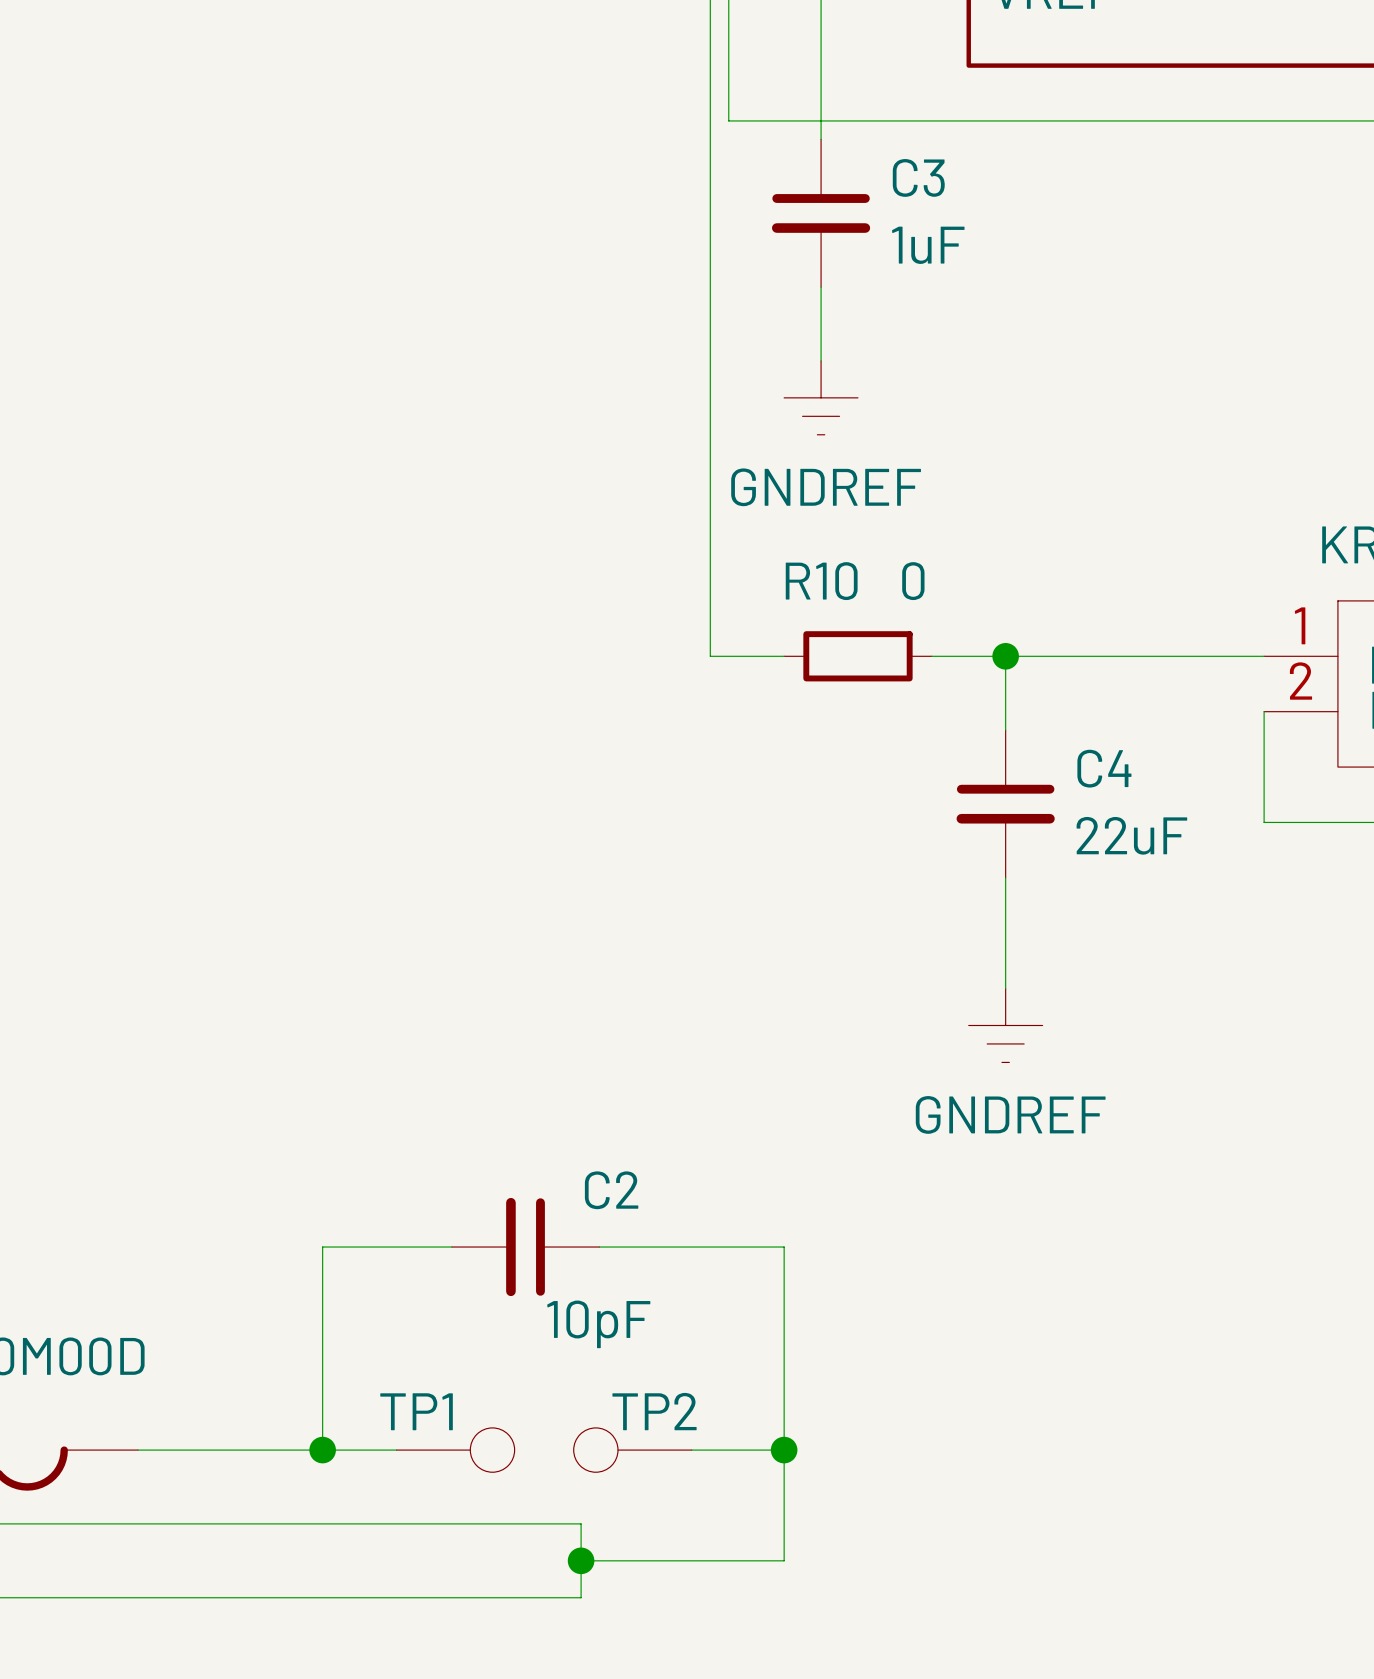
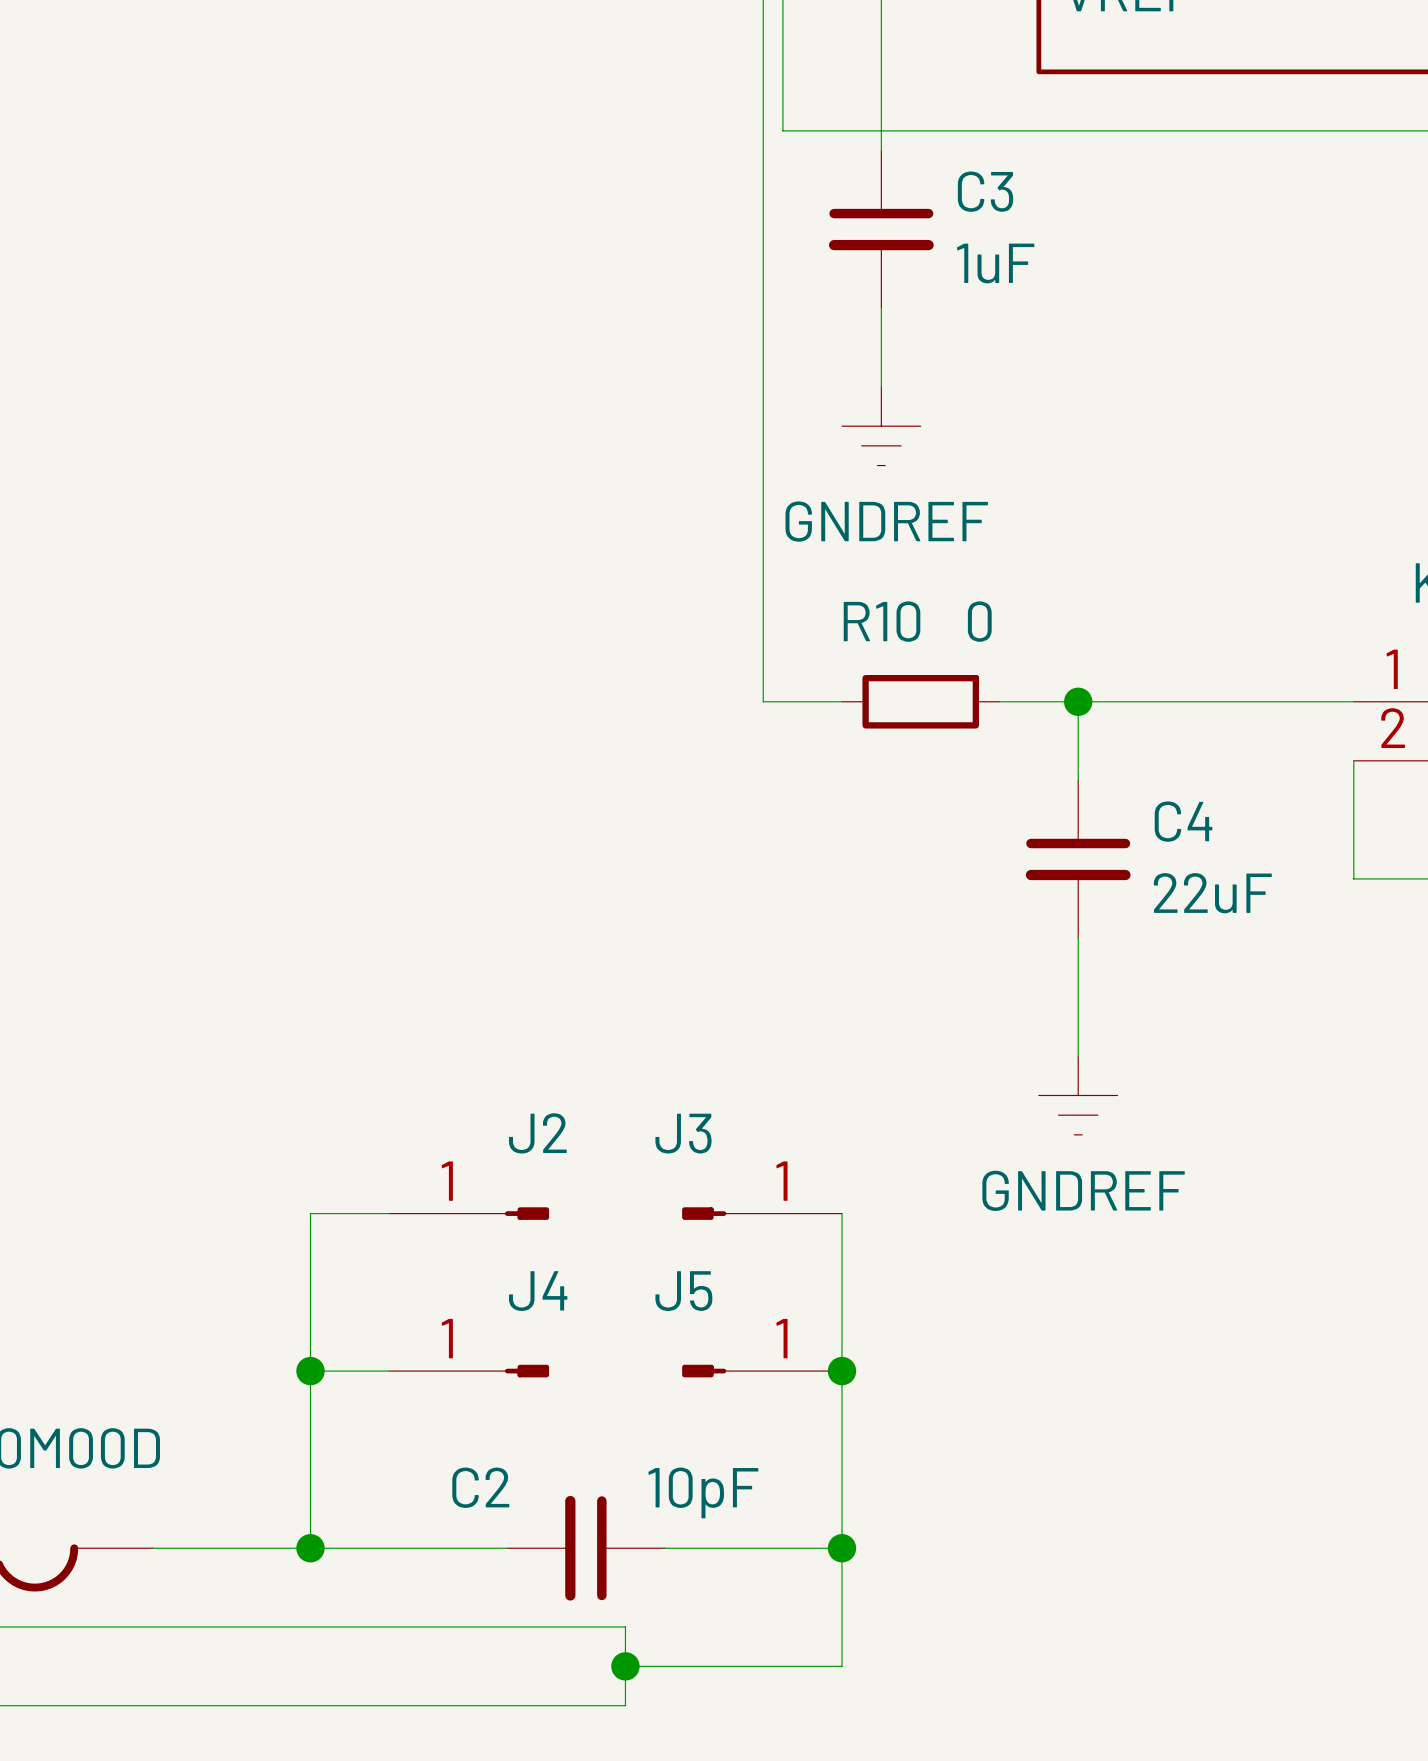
wire: none -> (389, 1213) (310, 1213) (310, 1548)
J2: none -> (469, 1213)
J3: none -> (762, 1213)
C2 name position: C2 (611, 1190) -> C2 (480, 1487)
wire: (451, 1247) (322, 1247) (322, 1450) -> none
C2 position: (525, 1247) -> (586, 1548)
wire: (599, 1247) (784, 1247) -> (841, 1213) (841, 1331)
wire: none -> (310, 1371) (389, 1371)
junction: none -> (310, 1371)
J4: none -> (469, 1371)
J5: none -> (762, 1371)
junction: none -> (841, 1371)
C2 value position: 10pF (598, 1324) -> 10pF (703, 1492)
junction position: (322, 1450) -> (310, 1548)
TP1: (455, 1450) -> none
TP2: (632, 1450) -> none

